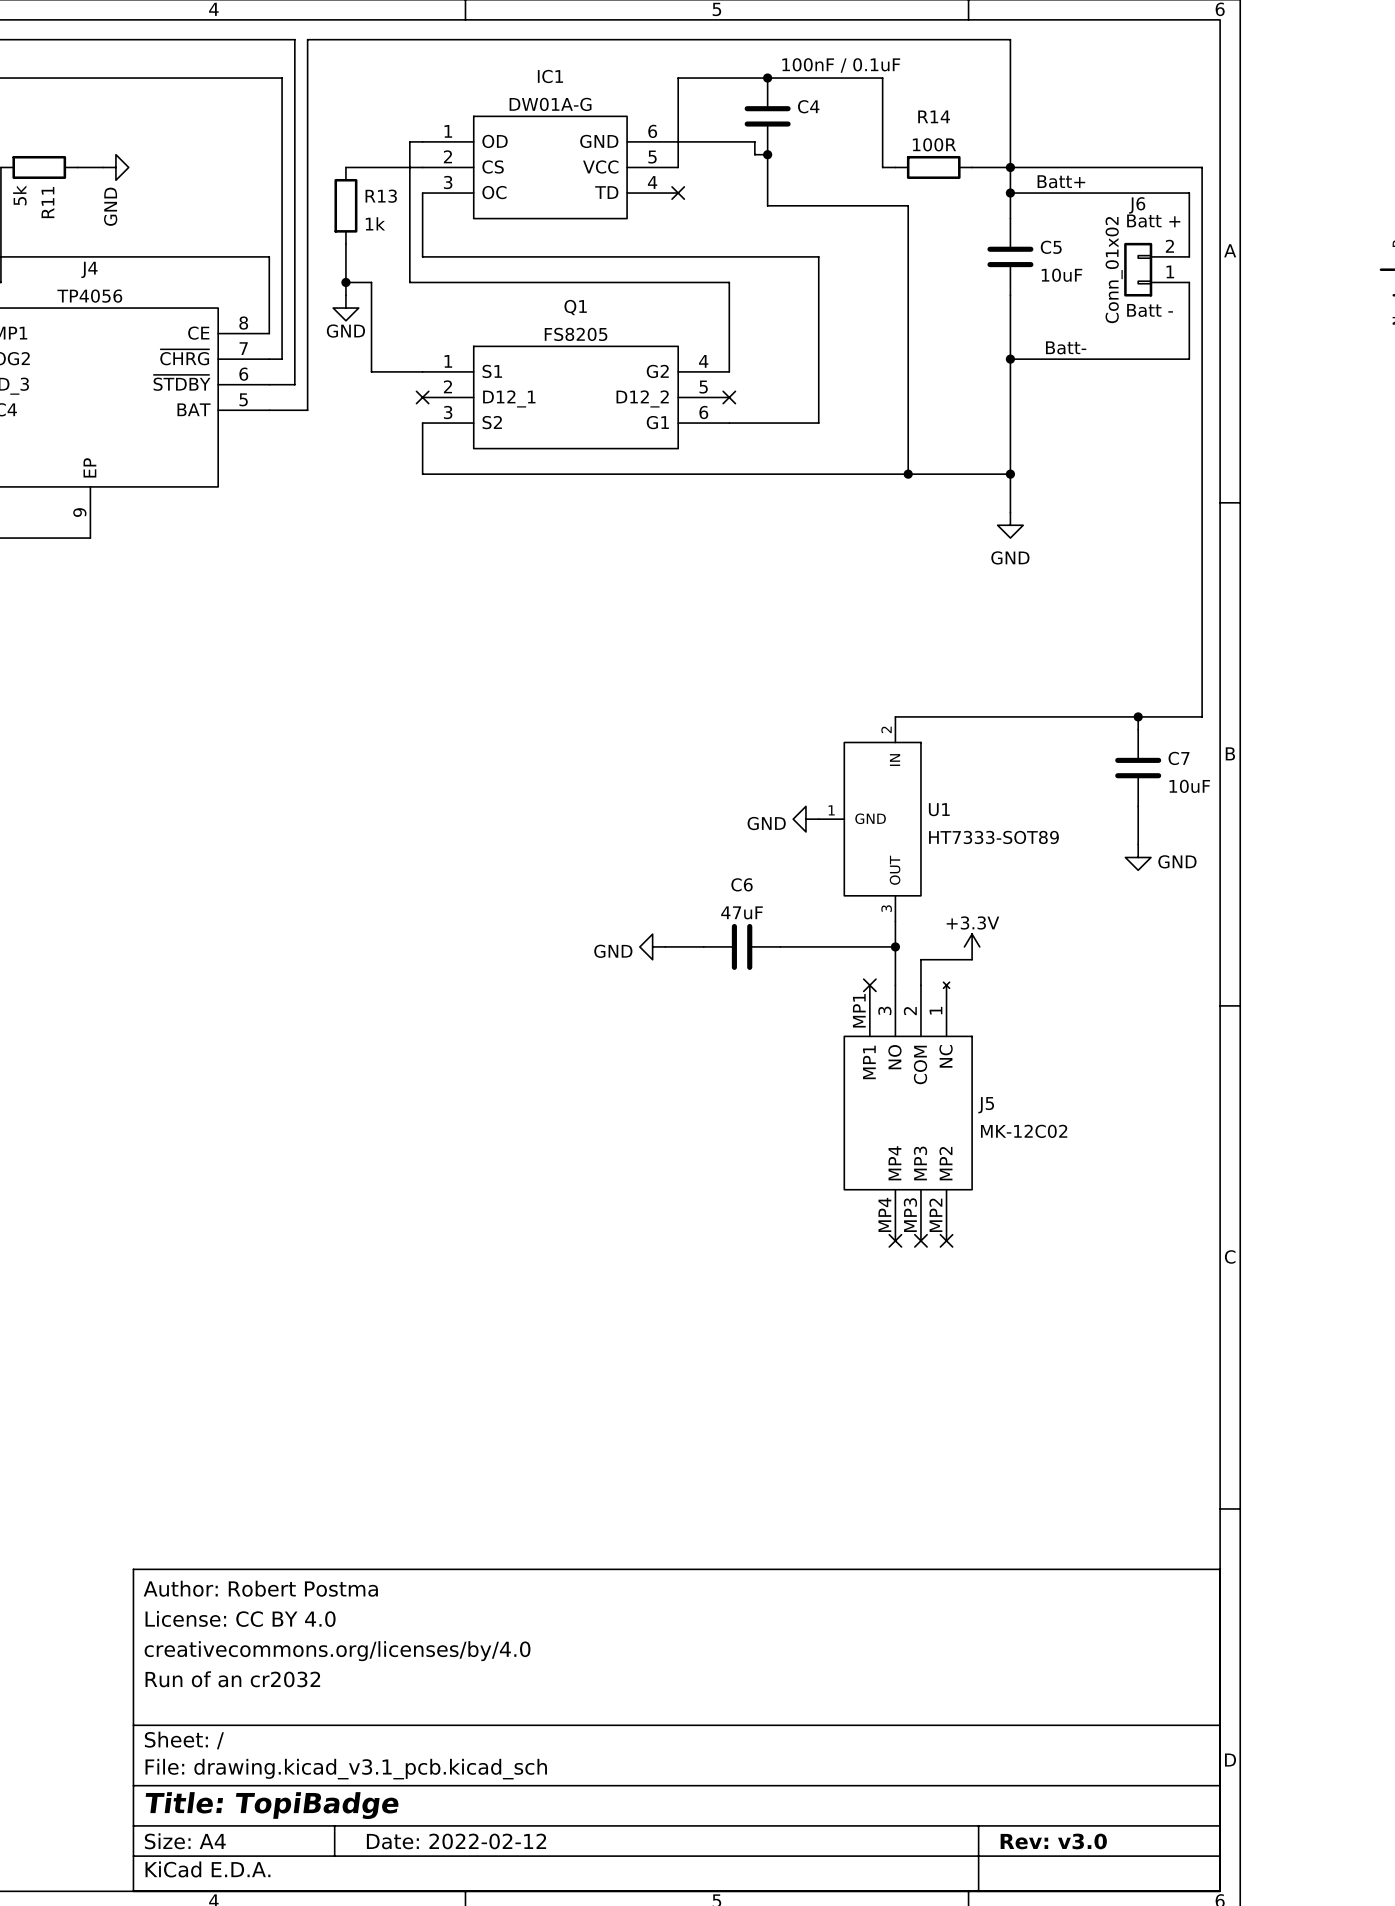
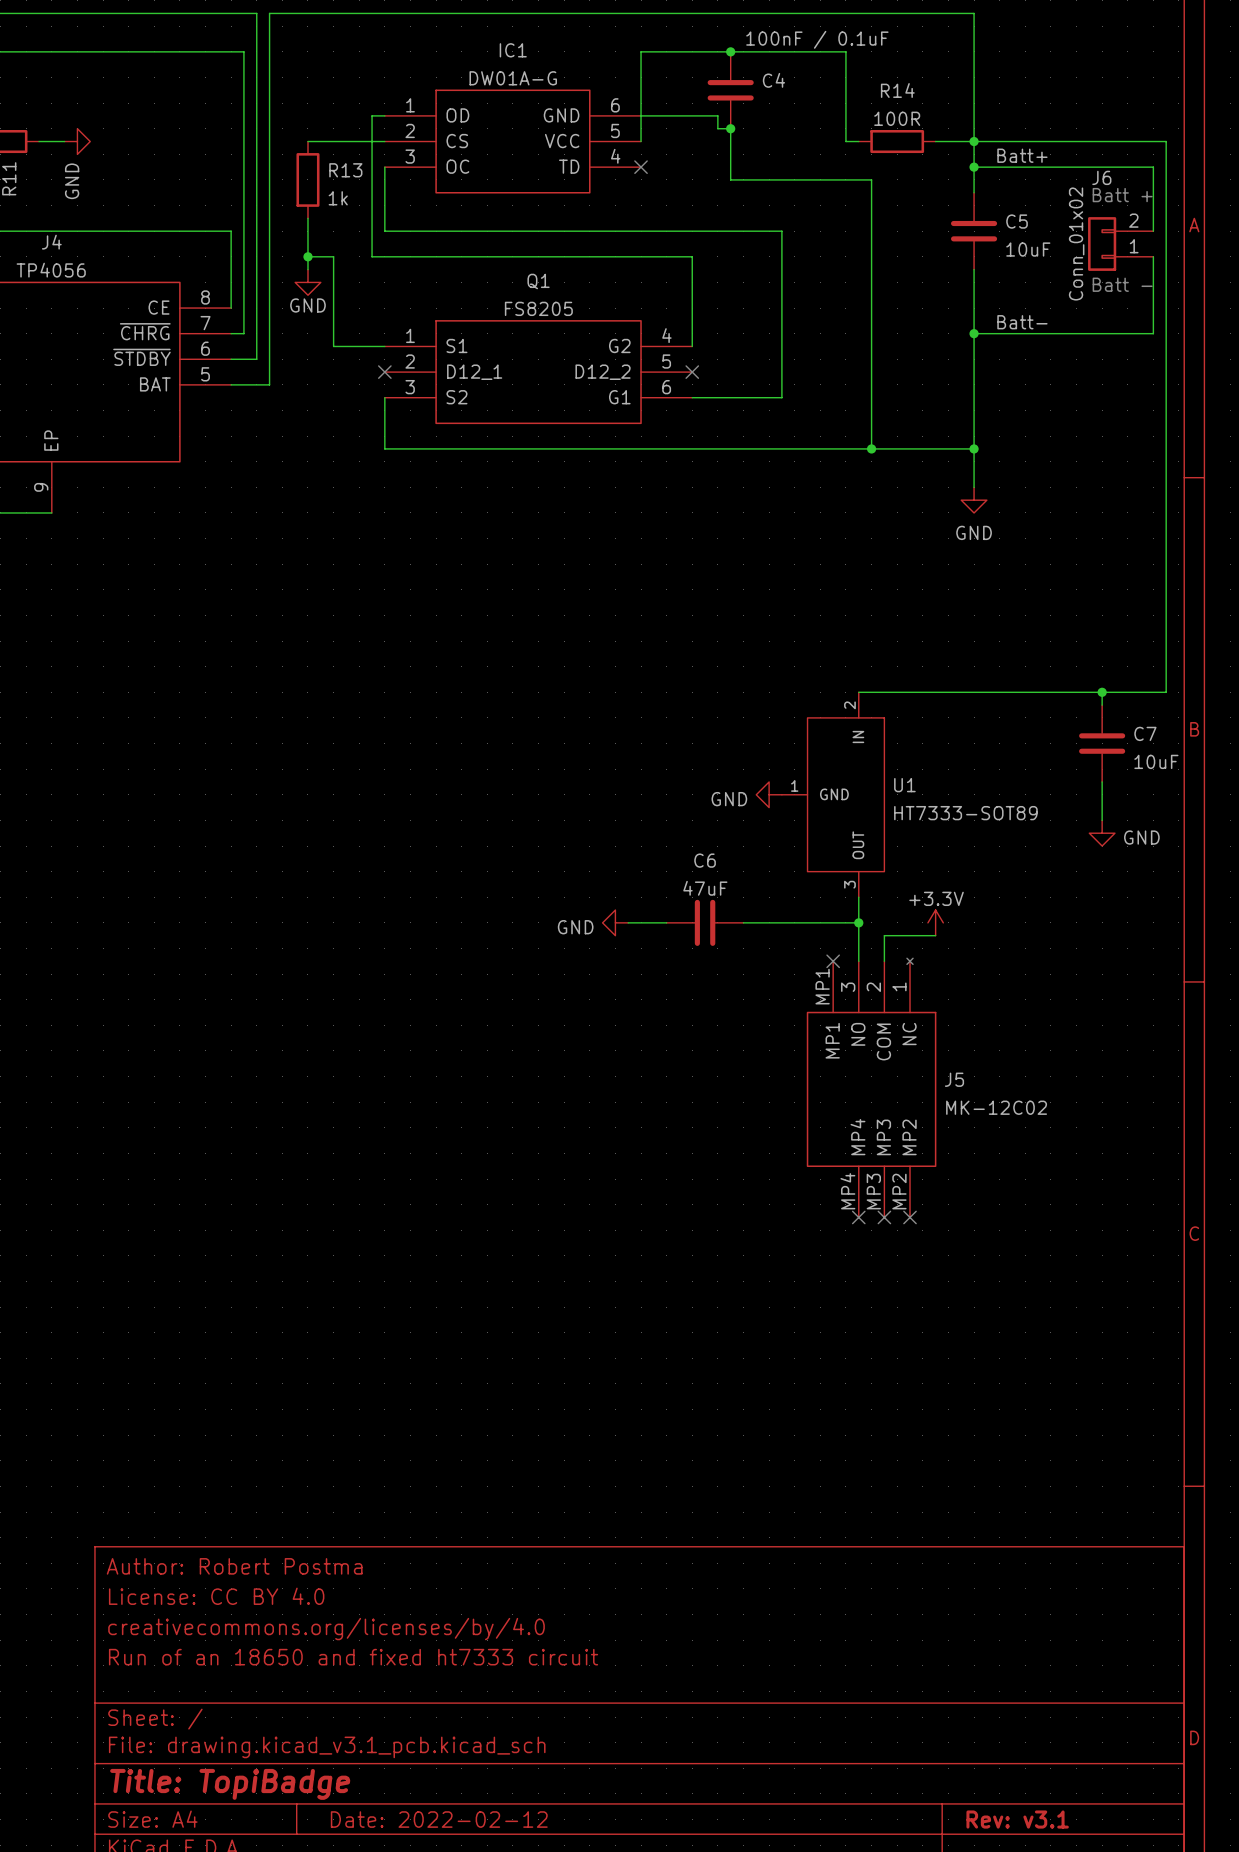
title block: Run of an cr2032 (232, 1679) -> Run of an 18650 and fixed ht7333 circuit (353, 1657)
title block: Rev: v3.0 (1053, 1841) -> Rev: v3.1 (1017, 1819)

